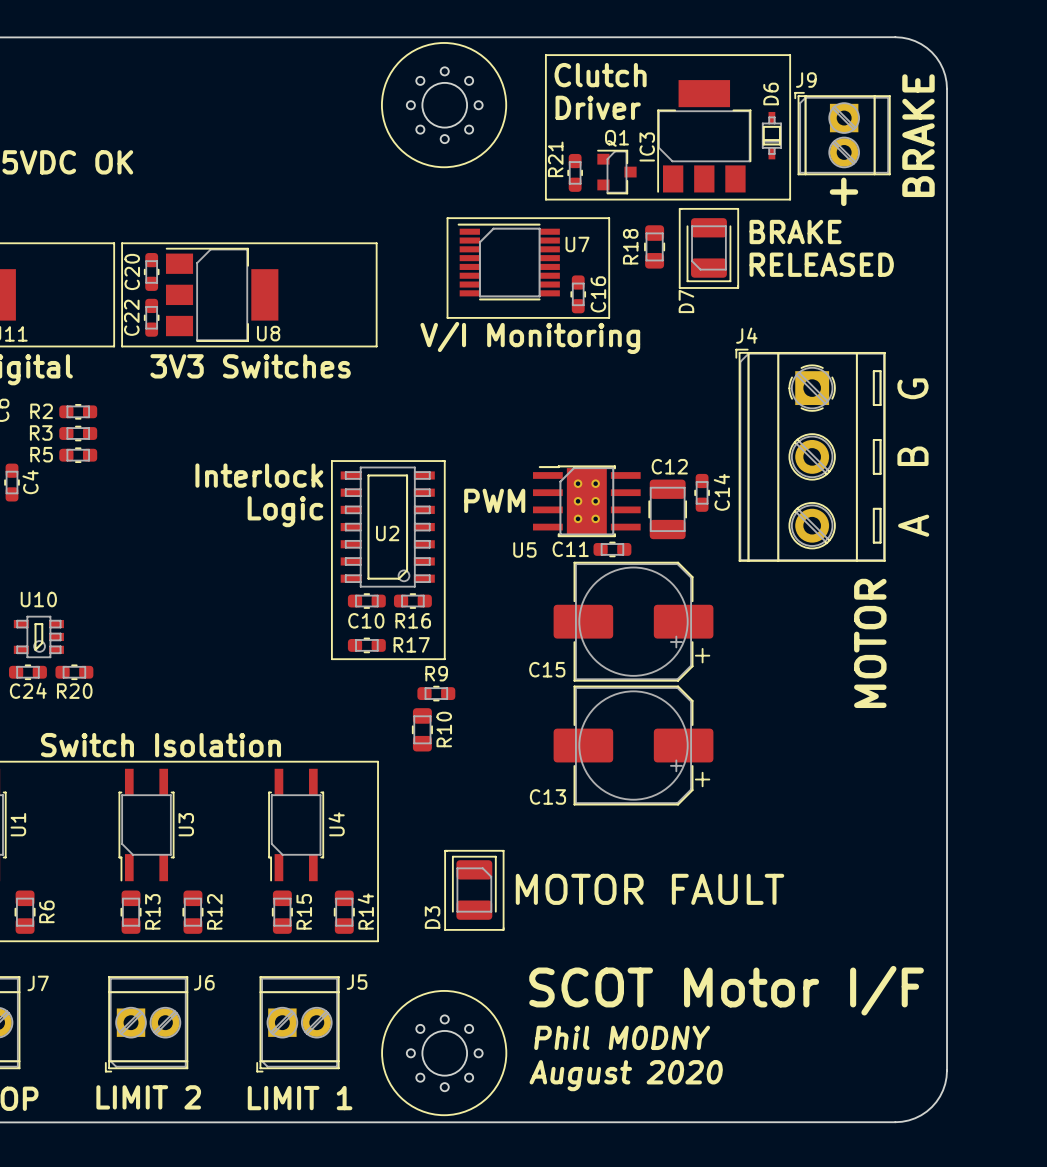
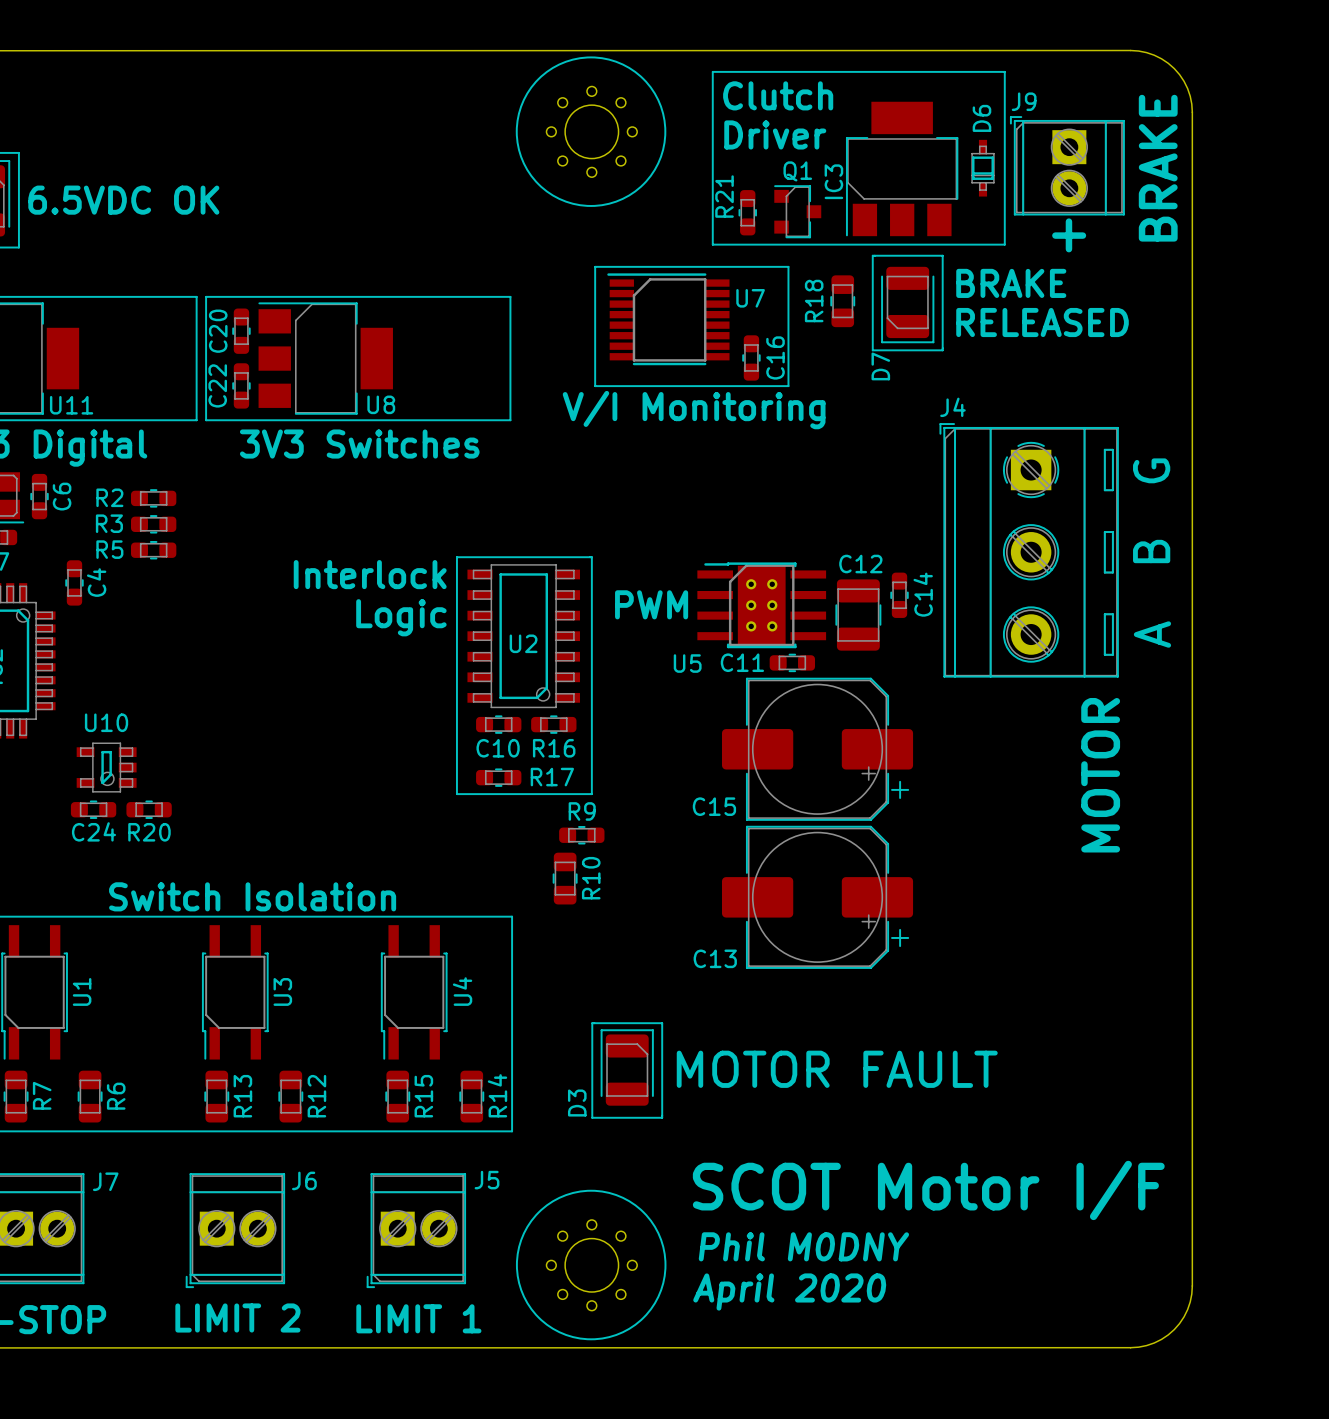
text: August 2020 (626, 1075) -> April 2020 (789, 1292)

